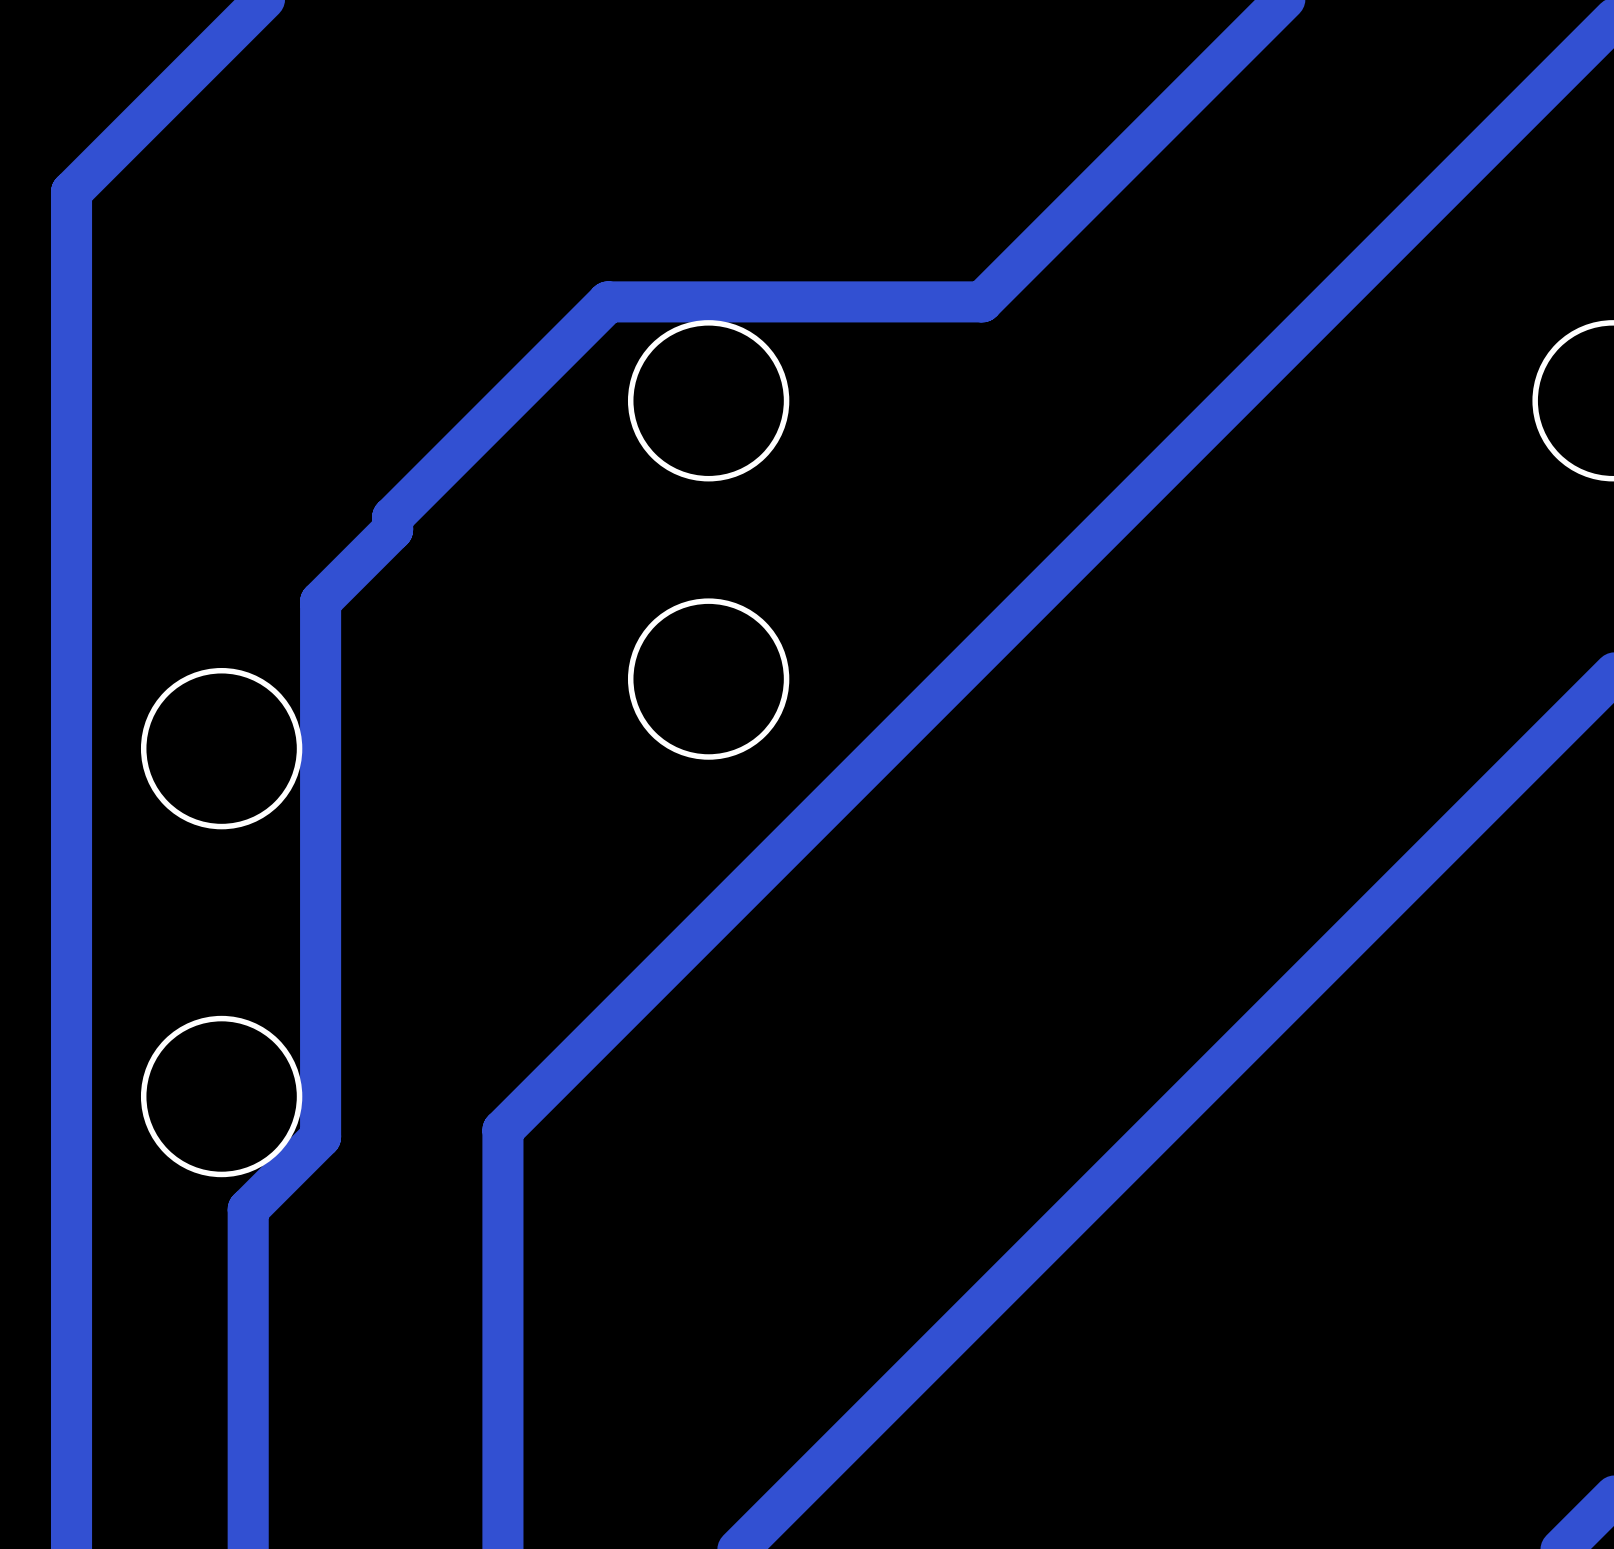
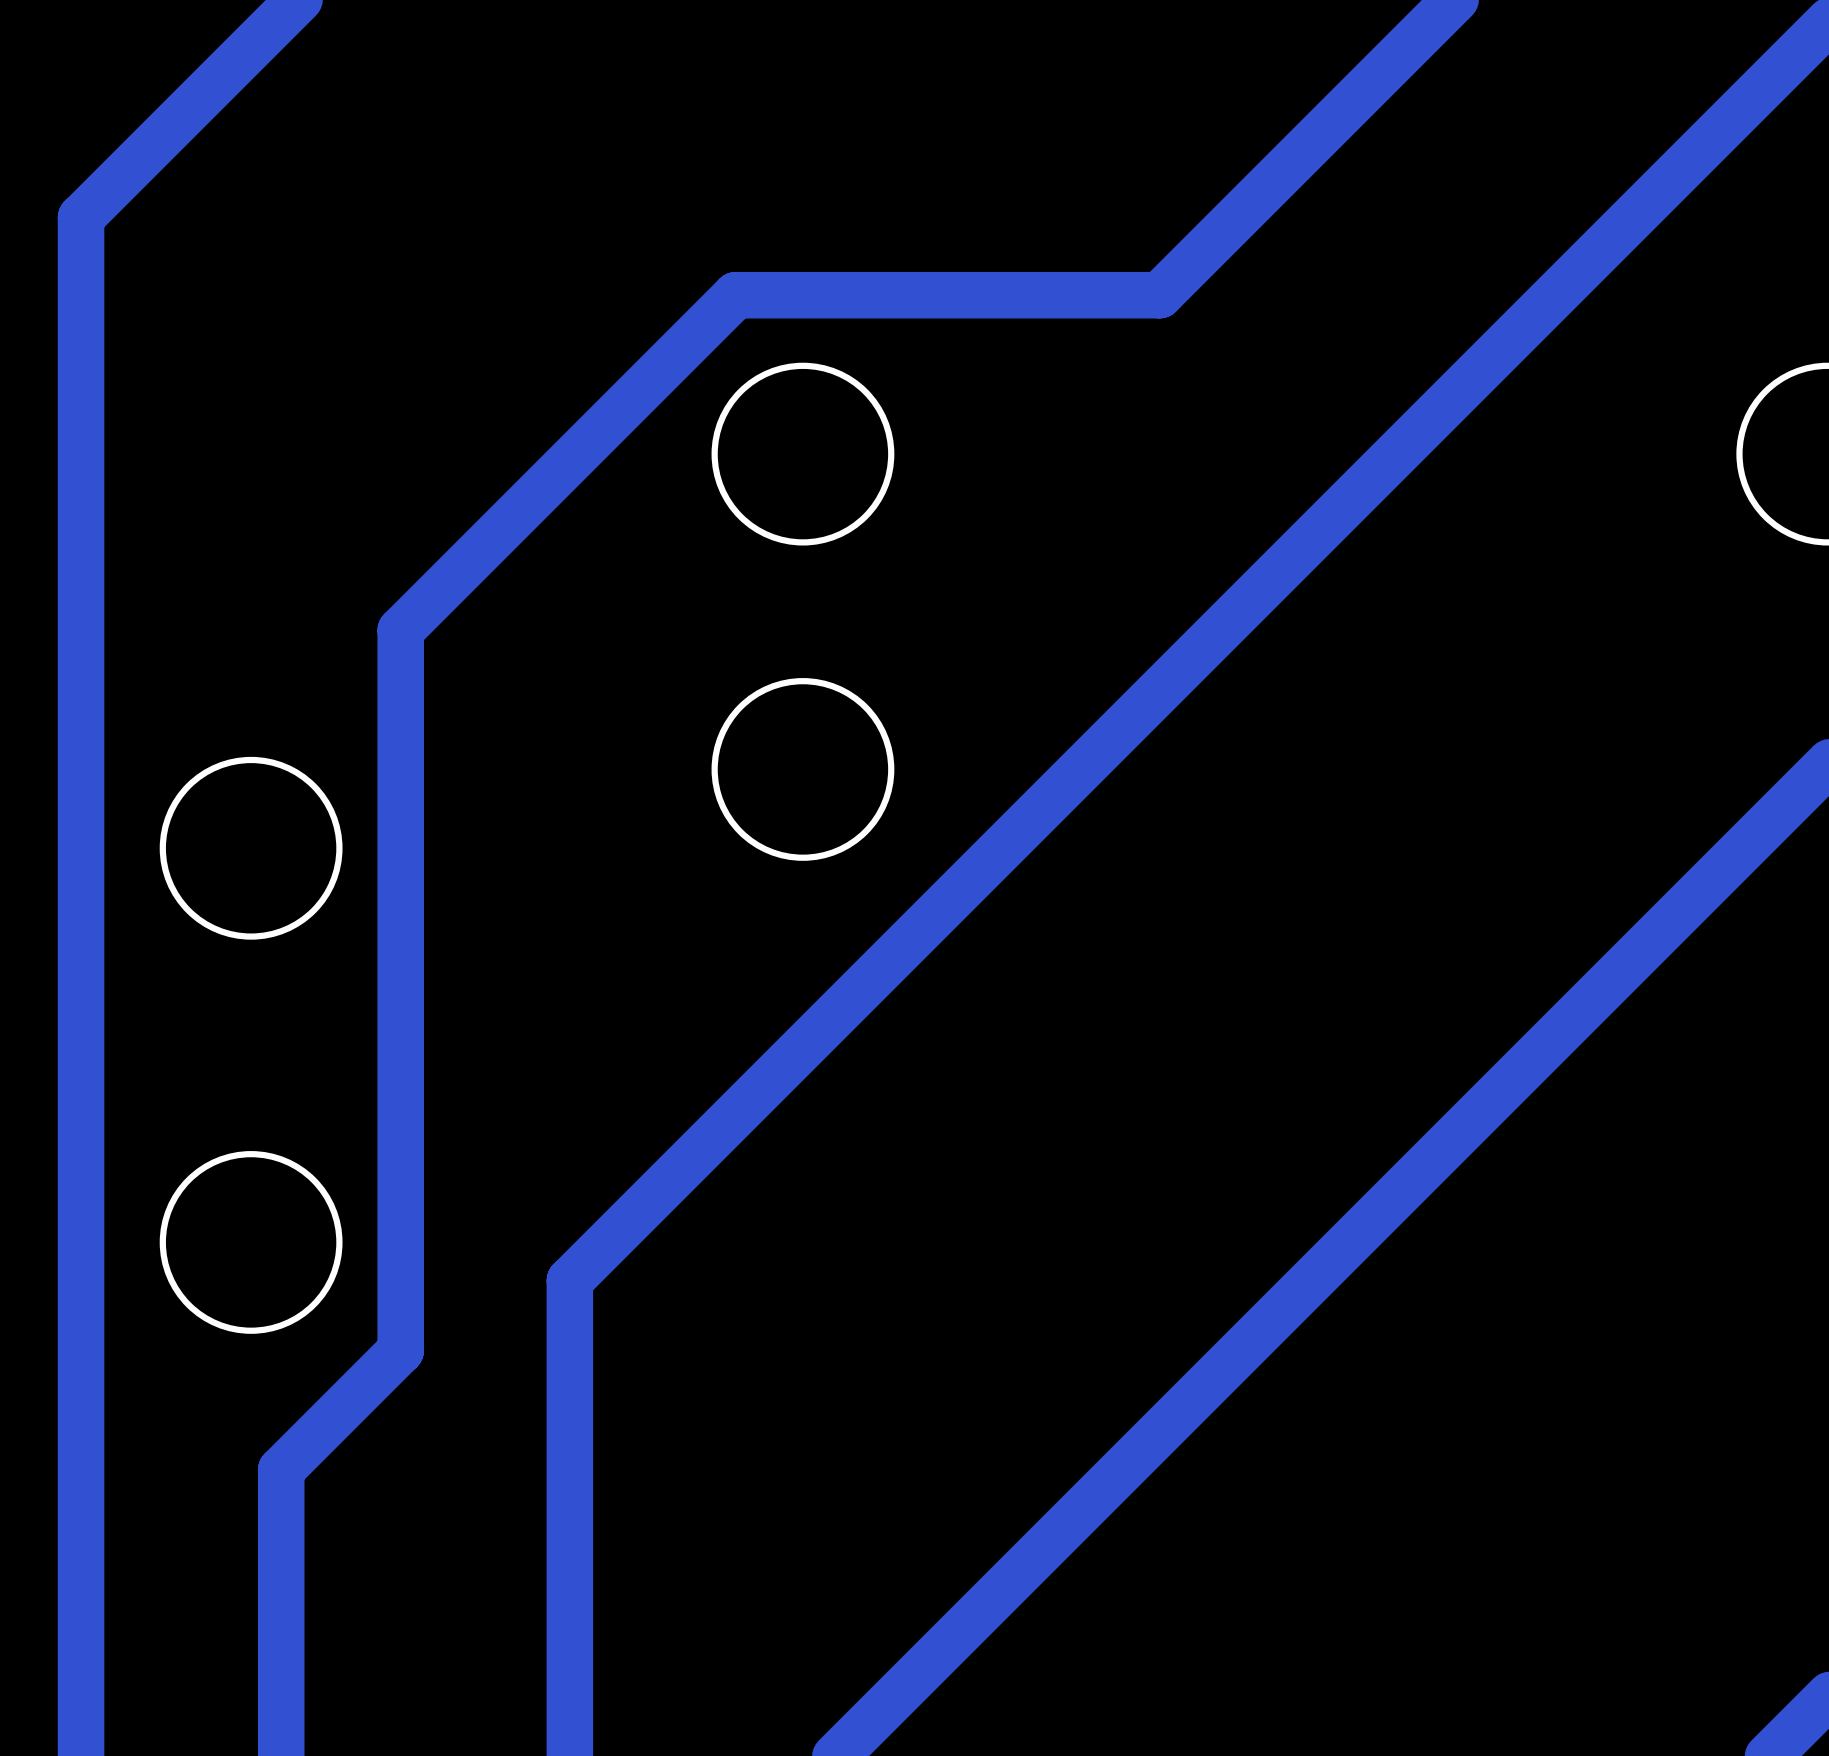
track: (1023, 260) (982, 301) (608, 301) -> (1159, 295) (735, 295) (689, 342)
track: (392, 517) (392, 529) (320, 601) (320, 1137) (248, 1209) (248, 1297) -> (444, 586) (400, 630) (400, 1350) (281, 1469)

